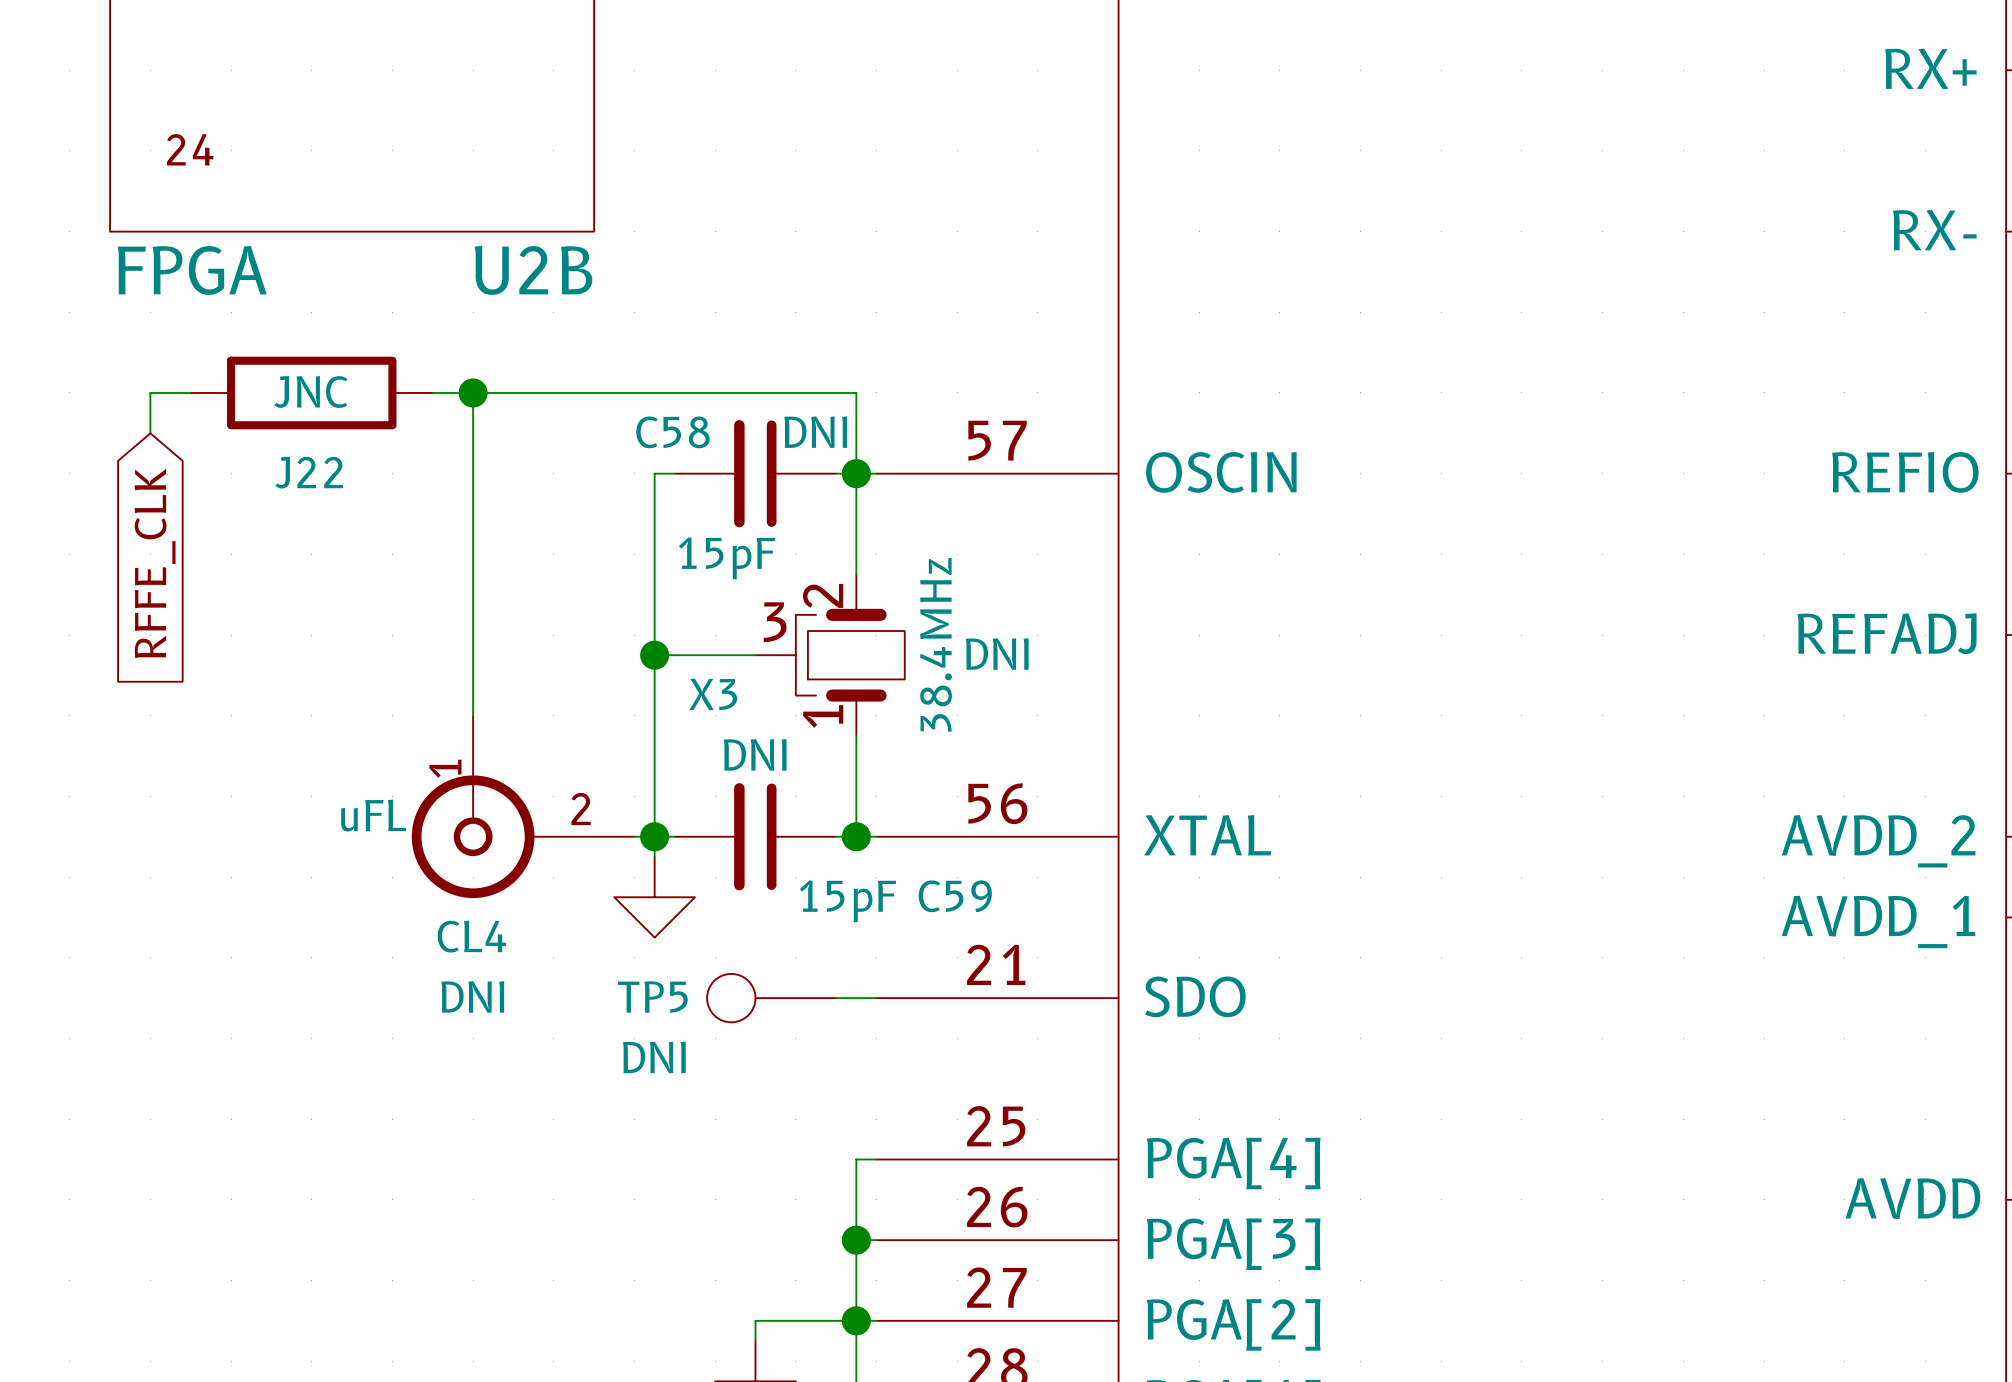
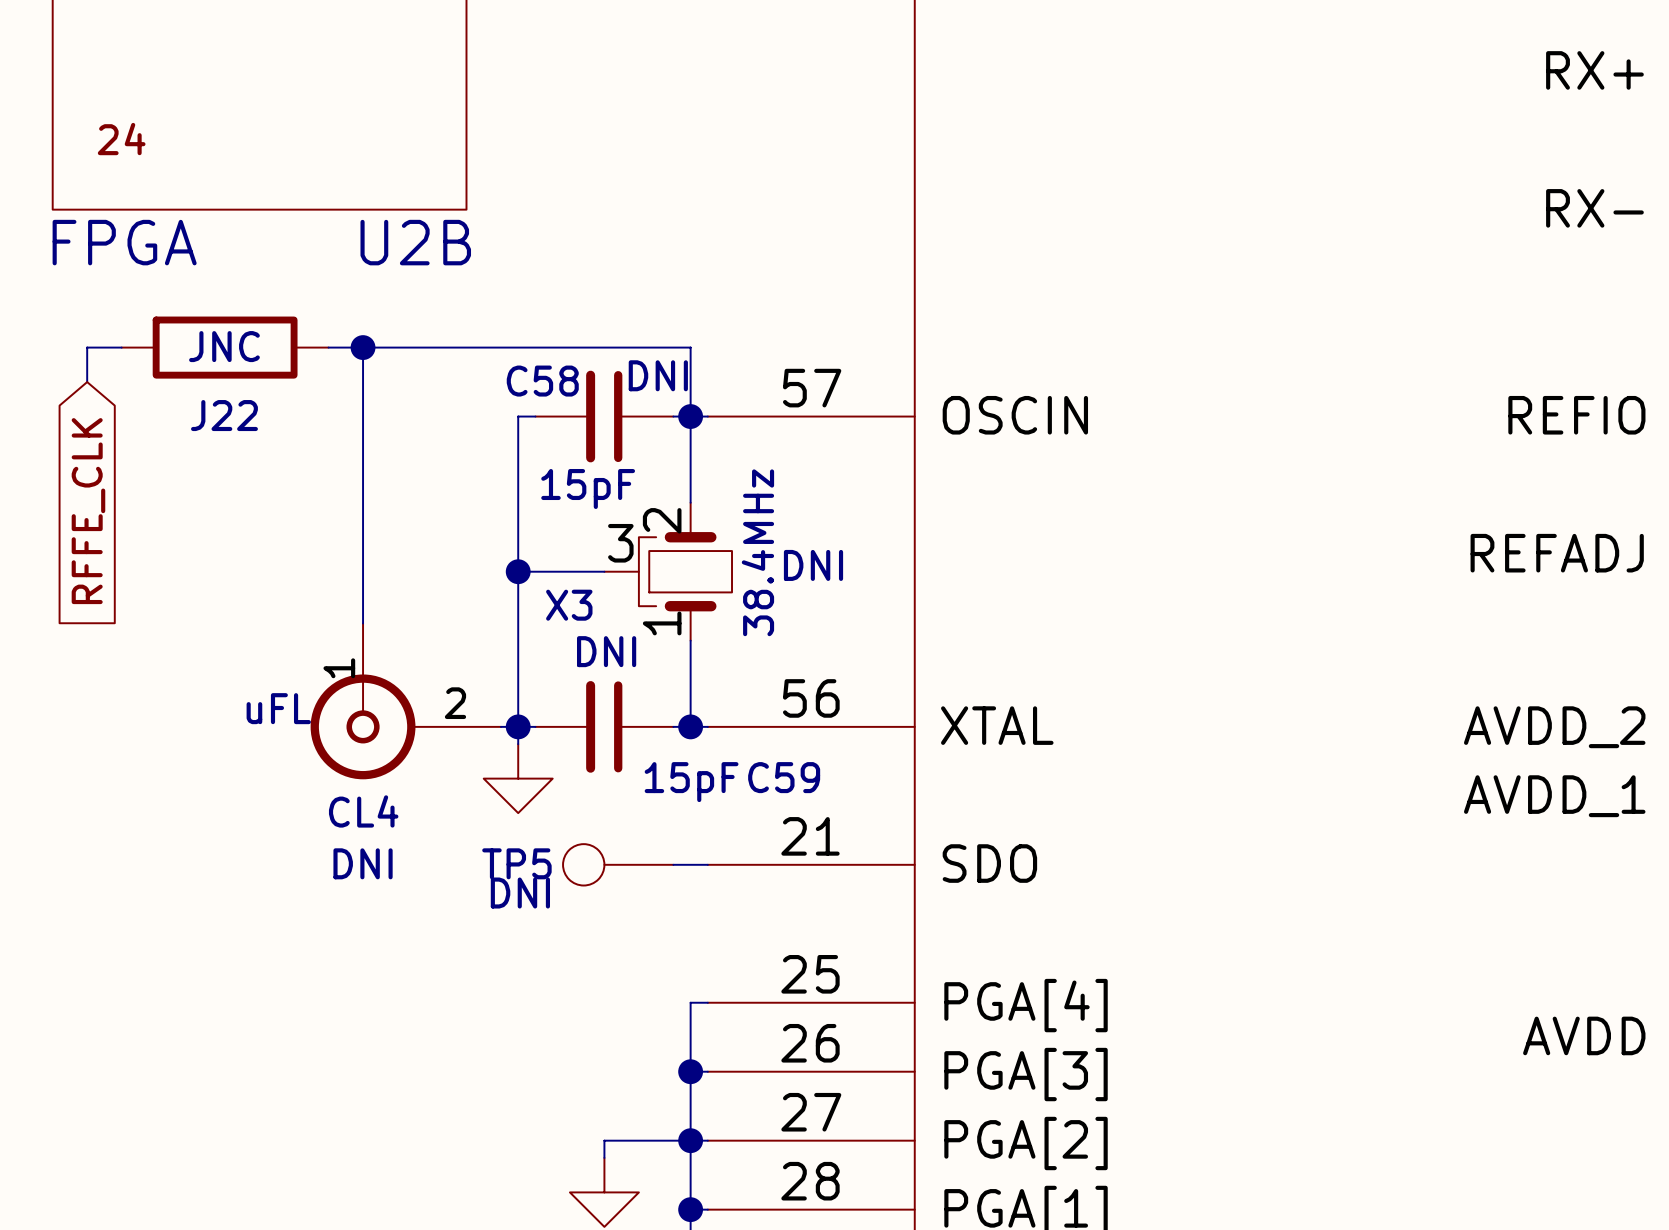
text: none -> DNI (658, 375)
C58 text: DNI (815, 432) -> none
text: none -> DNI (813, 565)
X3 text: DNI (997, 654) -> none
text: none -> DNI (606, 651)
C59 text: DNI (755, 754) -> none
text: none -> DNI (520, 893)
TP5 text: DNI (654, 1057) -> none

